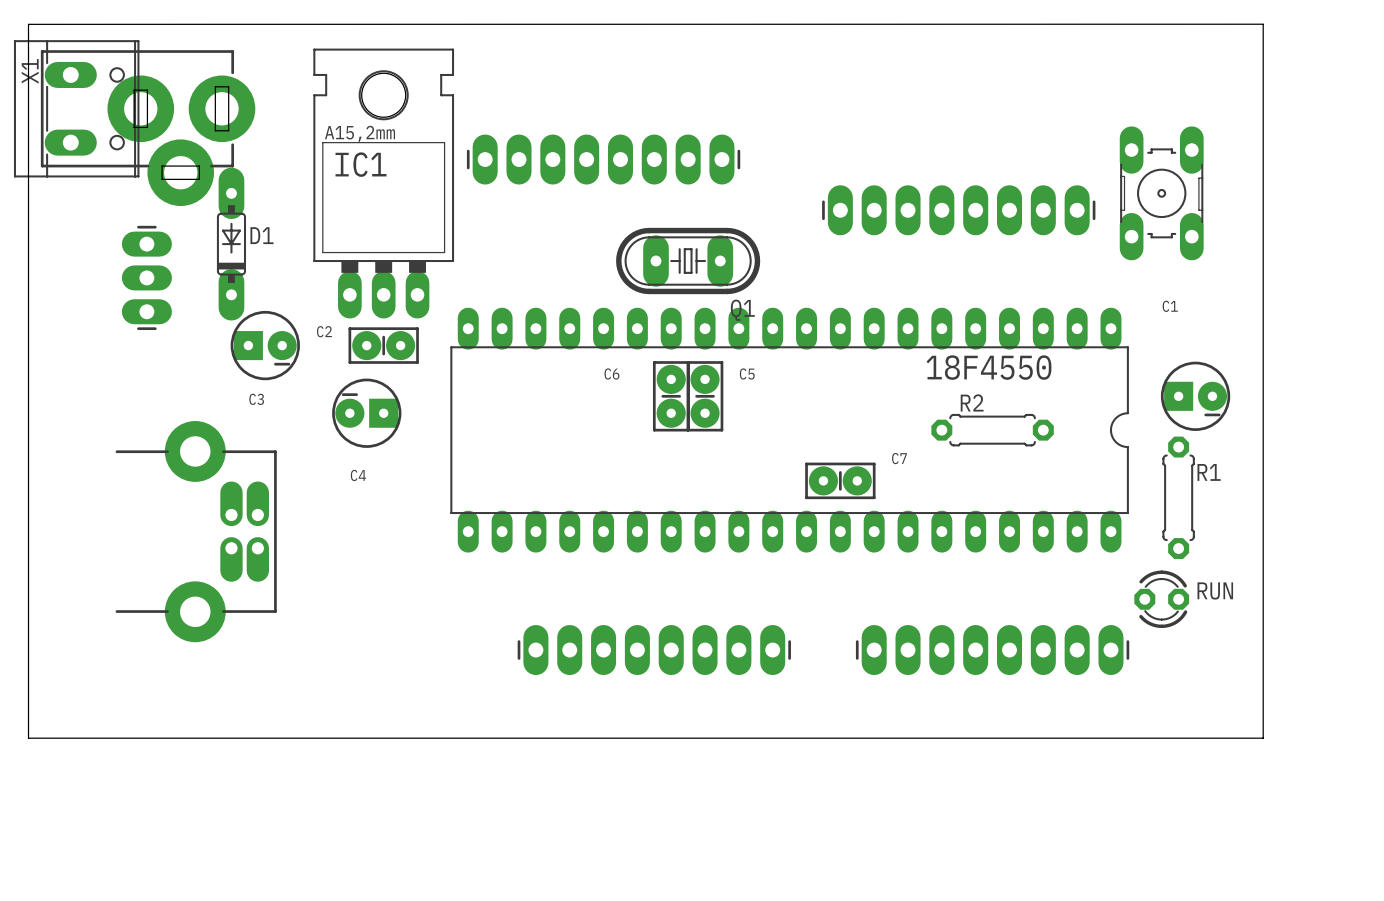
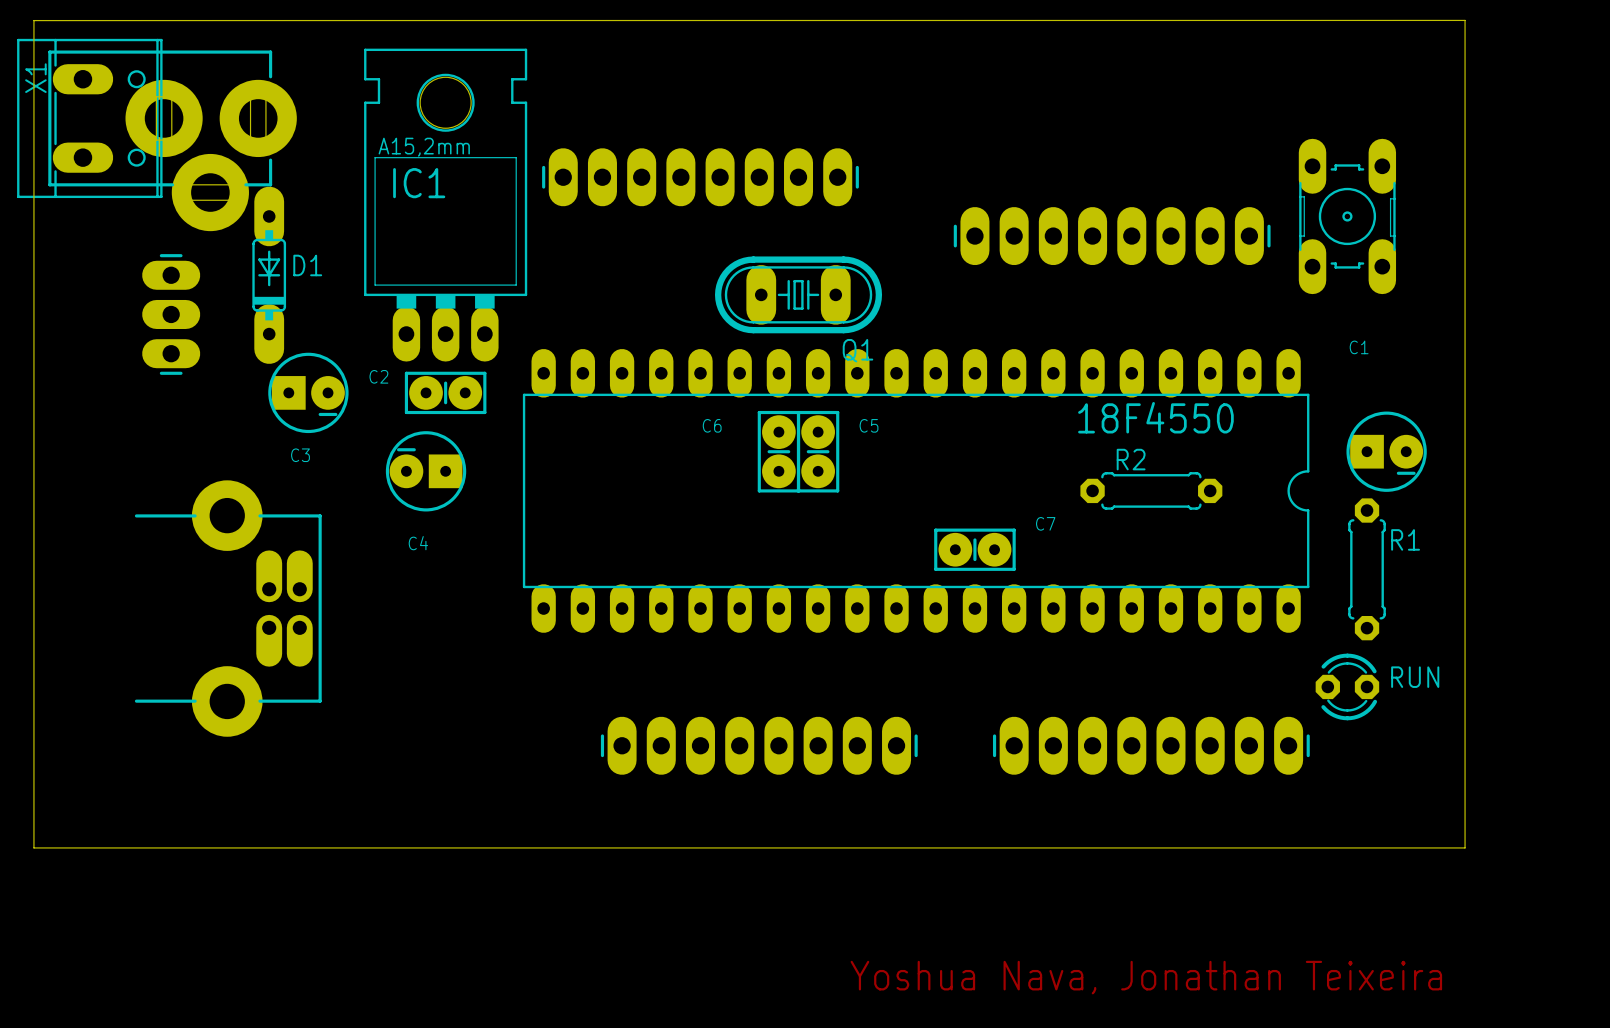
text: none -> Yoshua Nava, Jonathan Teixeira (1146, 977)

